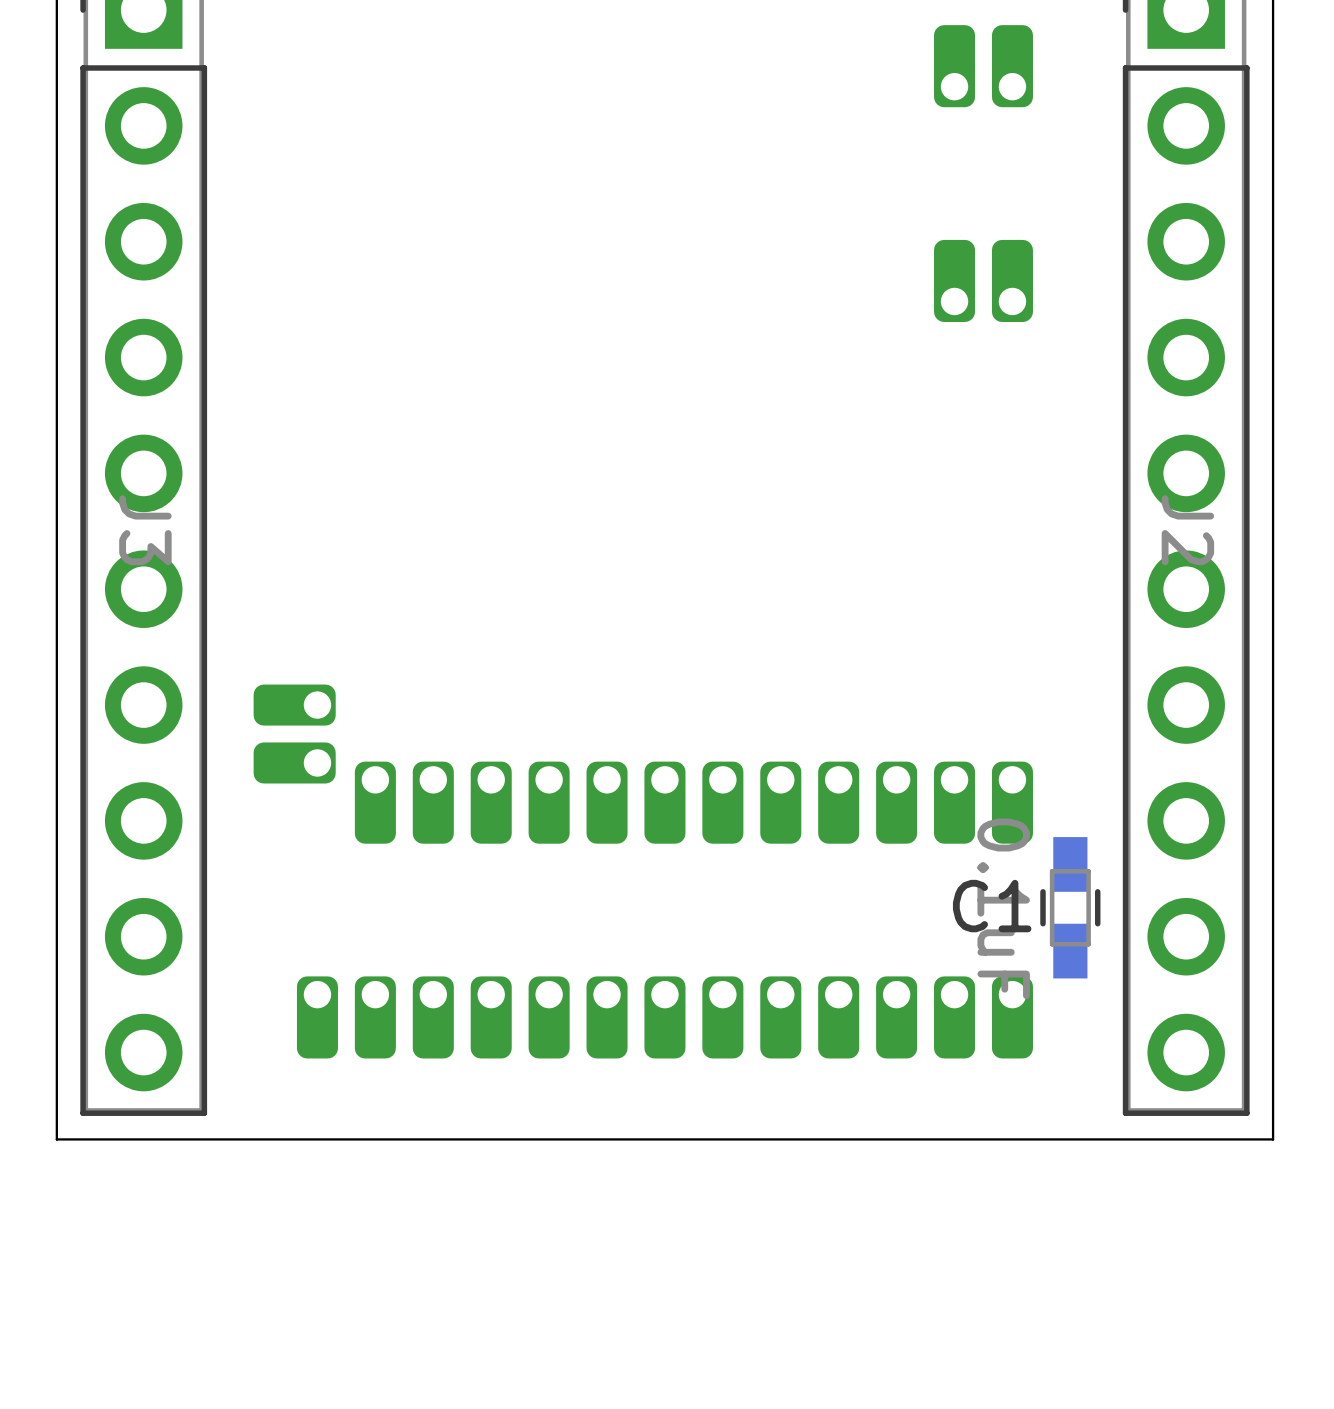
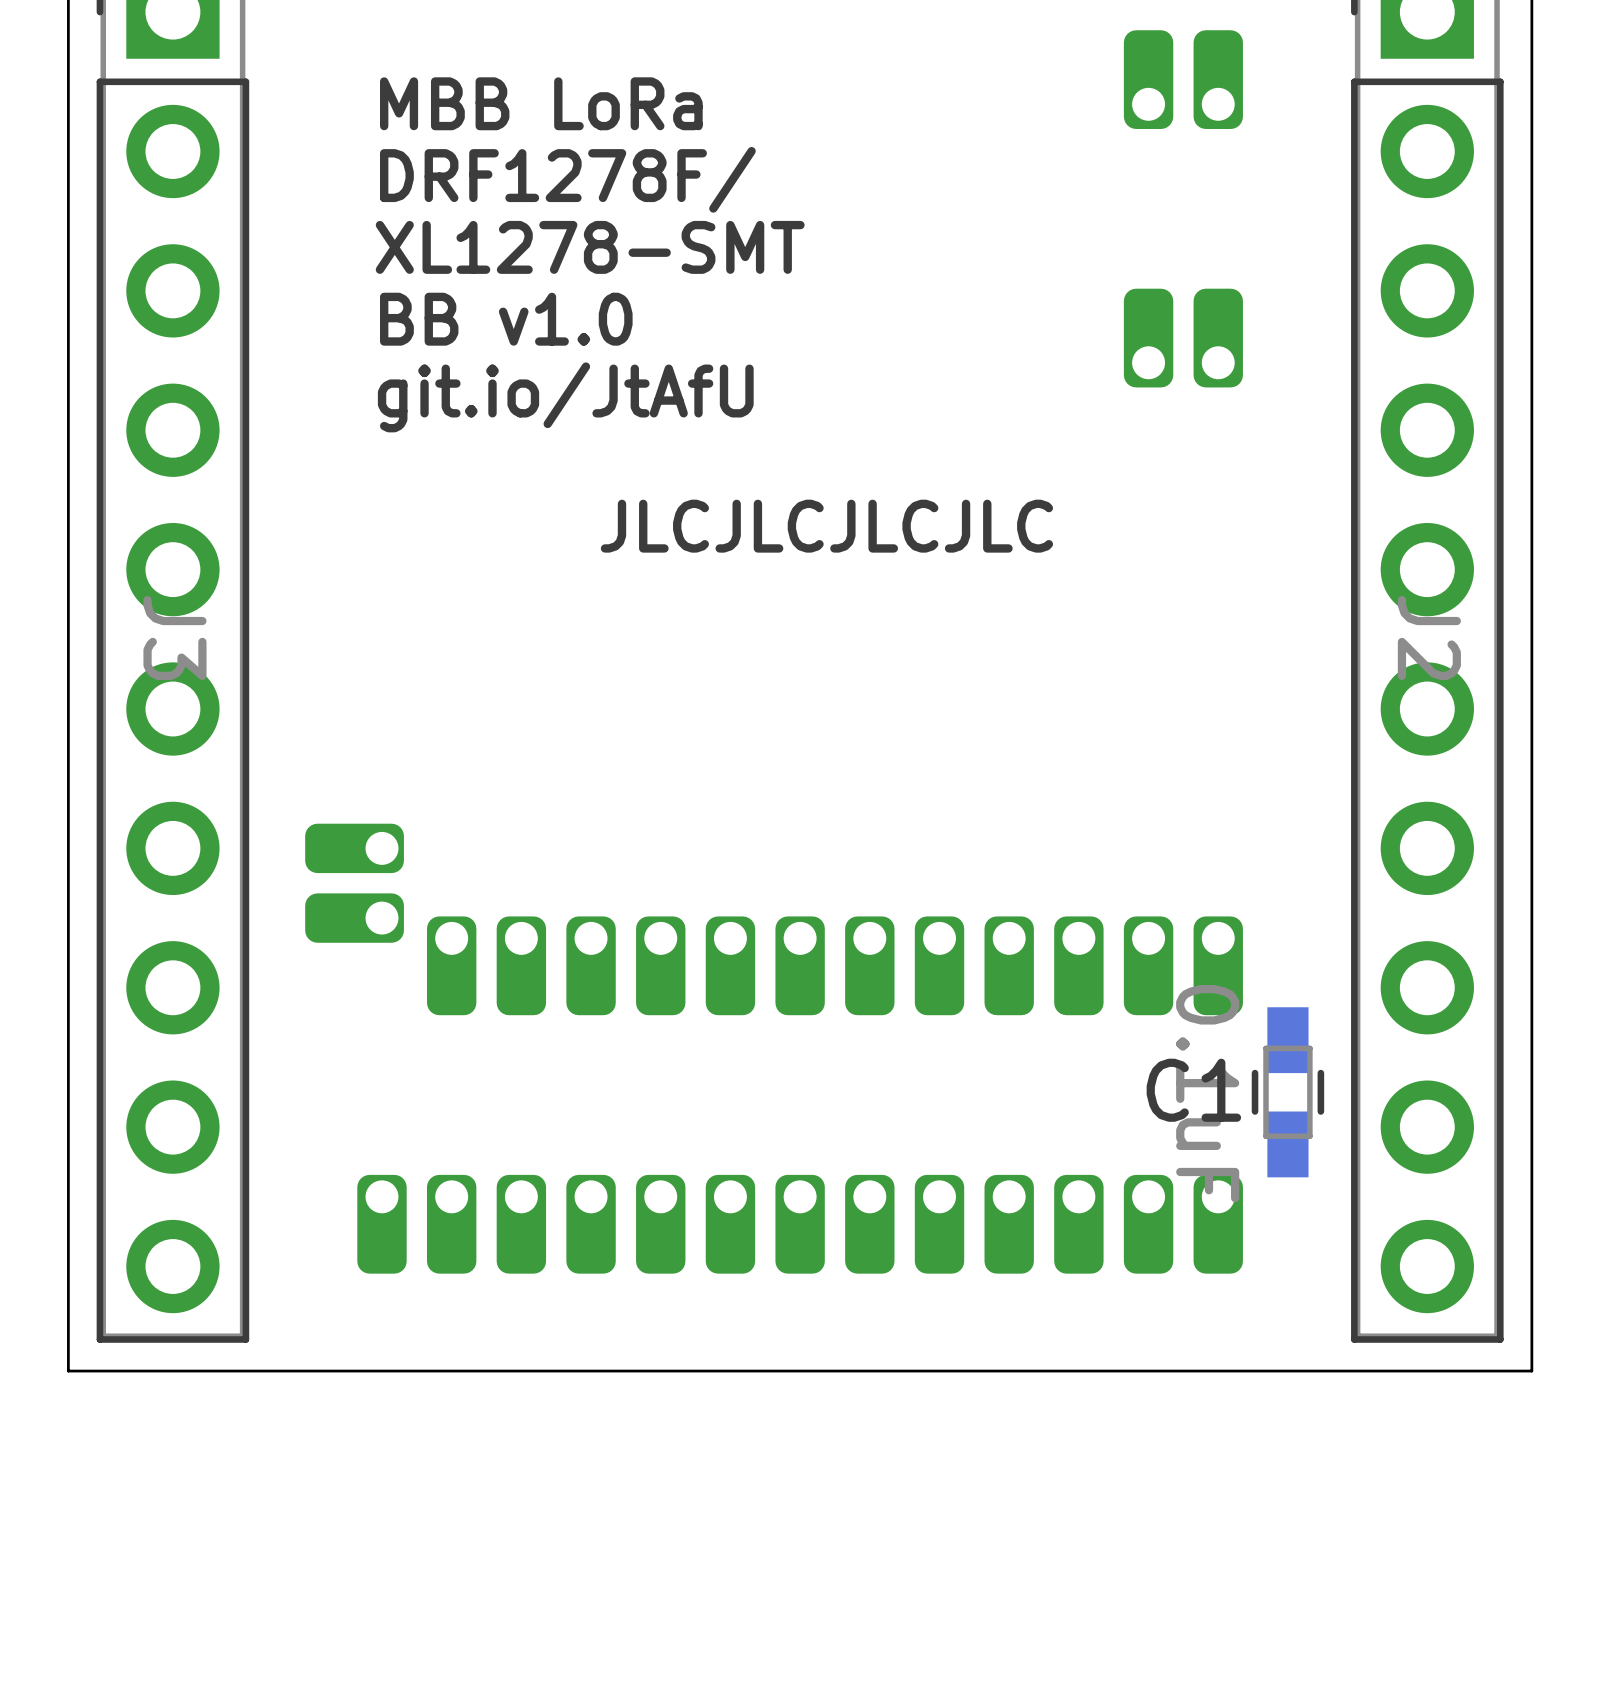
text: none -> MBB LoRa (541, 103)
text: none -> DRF1278F/ (567, 179)
text: none -> XL1278-SMT (590, 247)
text: none -> BB v1.0 (506, 319)
text: none -> git.io/JtAfU (565, 397)
text: none -> JLCJLCJLCJLC (826, 526)

